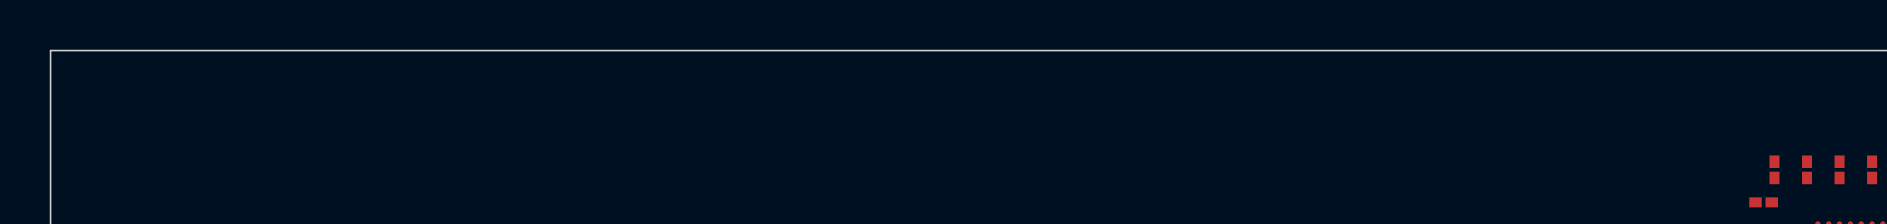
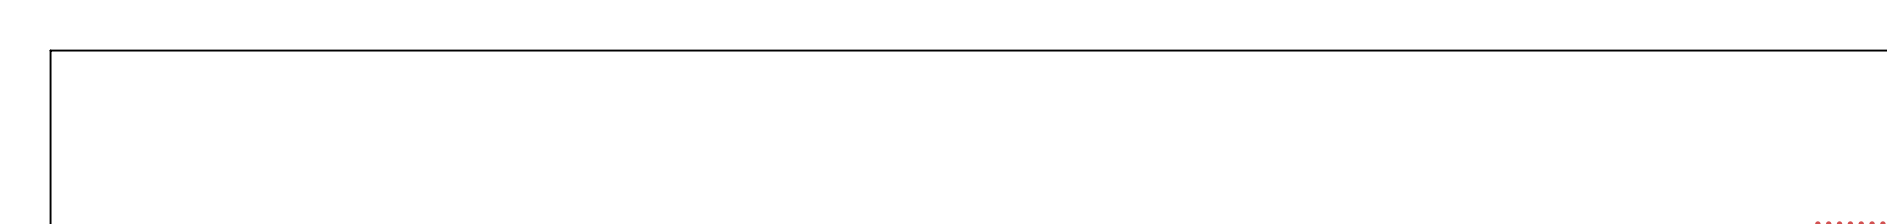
part: (1774, 169) -> none
part: (1807, 169) -> none
part: (1839, 169) -> none
part: (1872, 169) -> none
part: (1763, 202) -> none

